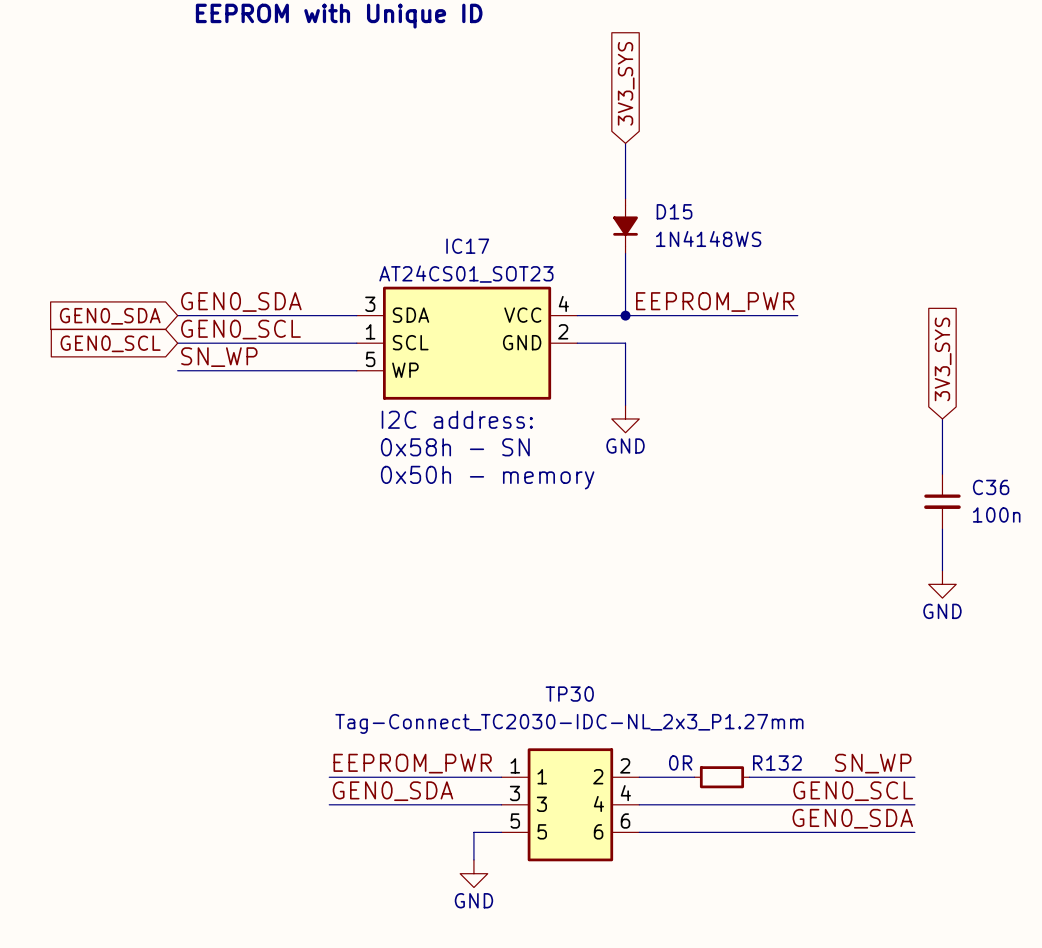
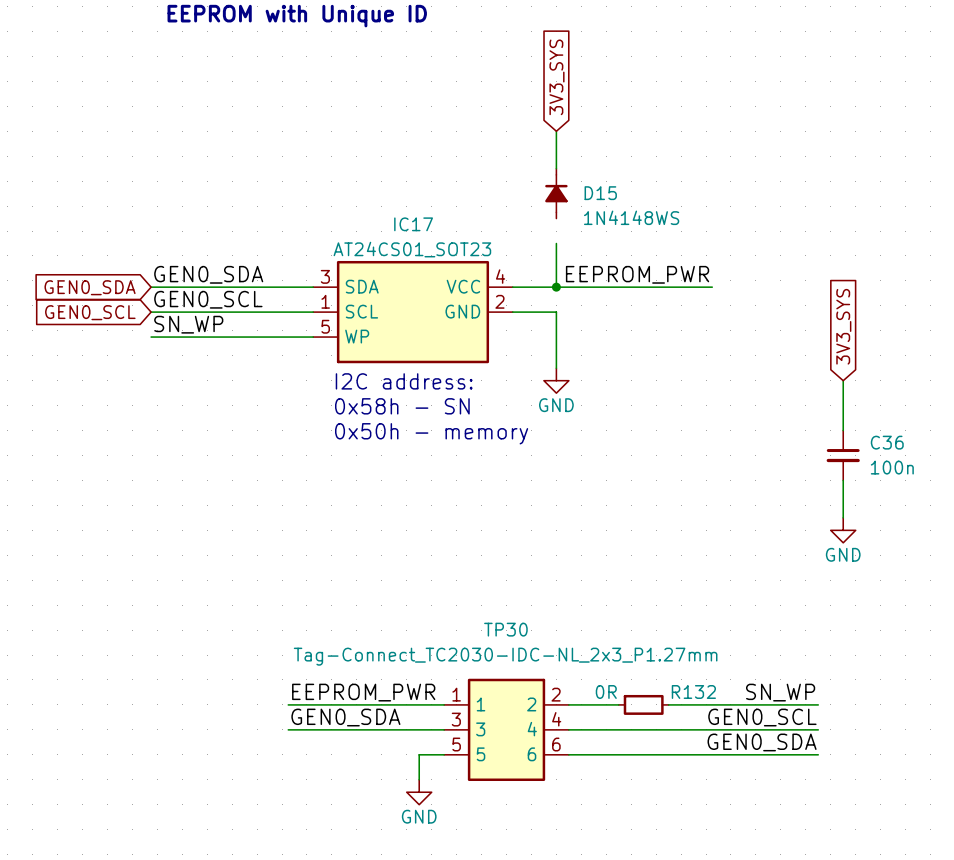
D15 rotation: 0° (625, 226) -> 180° (556, 193)
wire: (625, 253) (625, 267) -> none

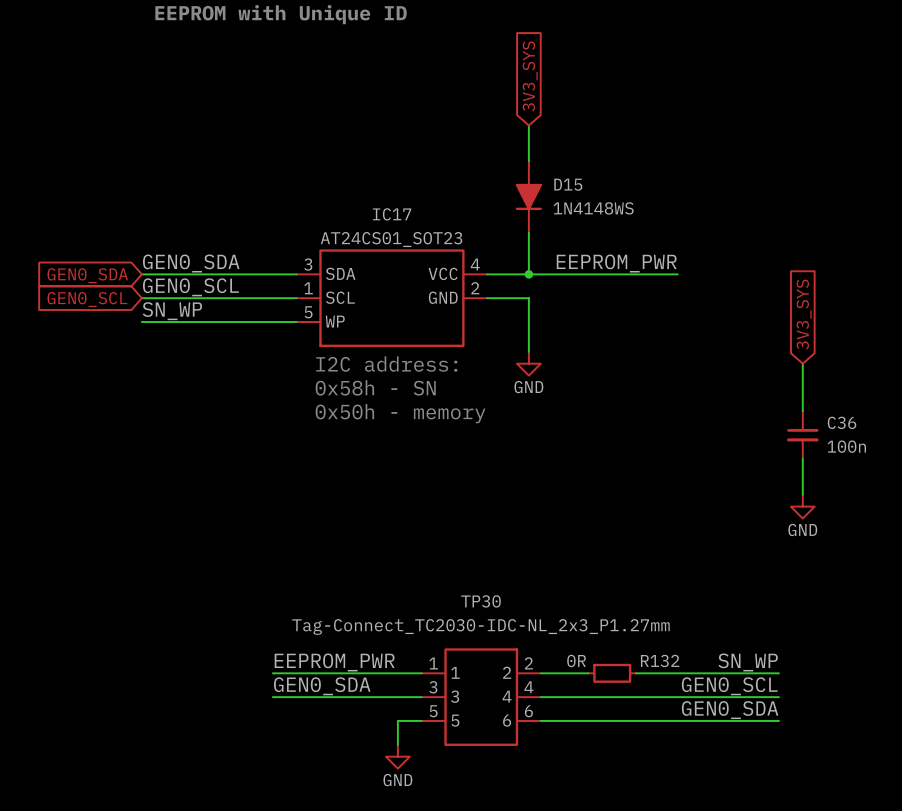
D15 symbol: [545, 168, 568, 219] -> [515, 161, 542, 233]

